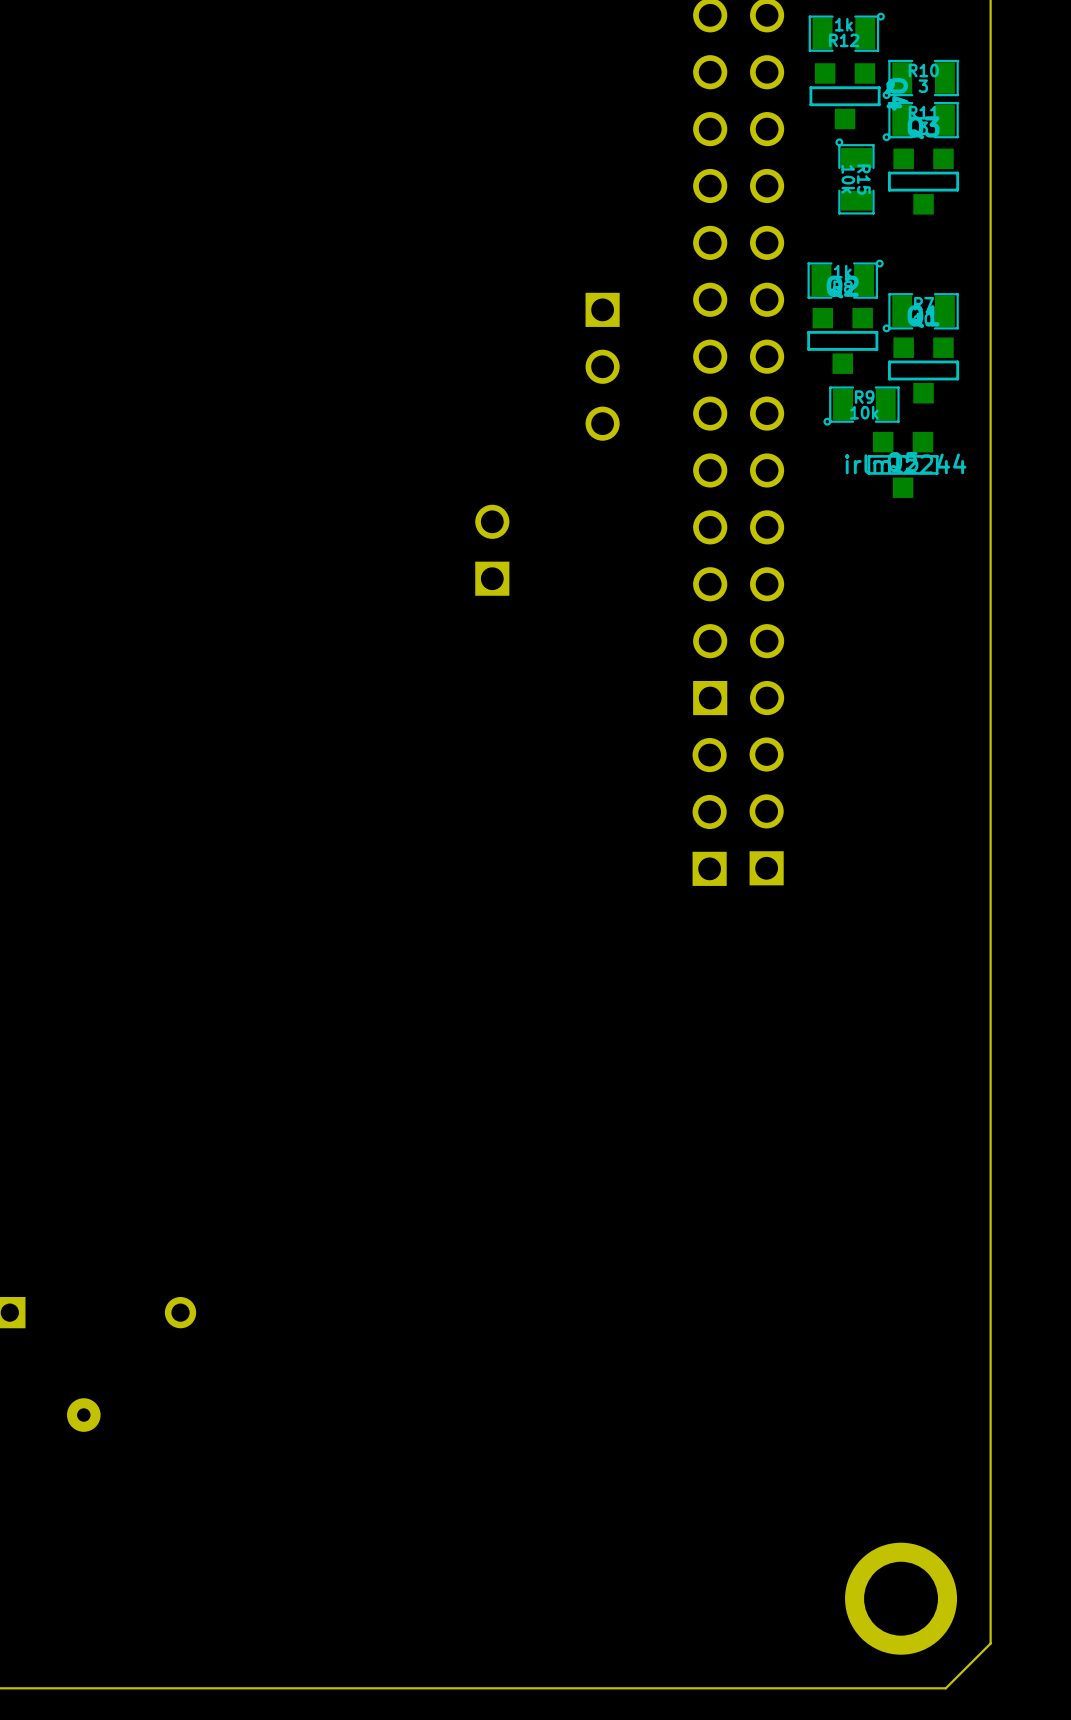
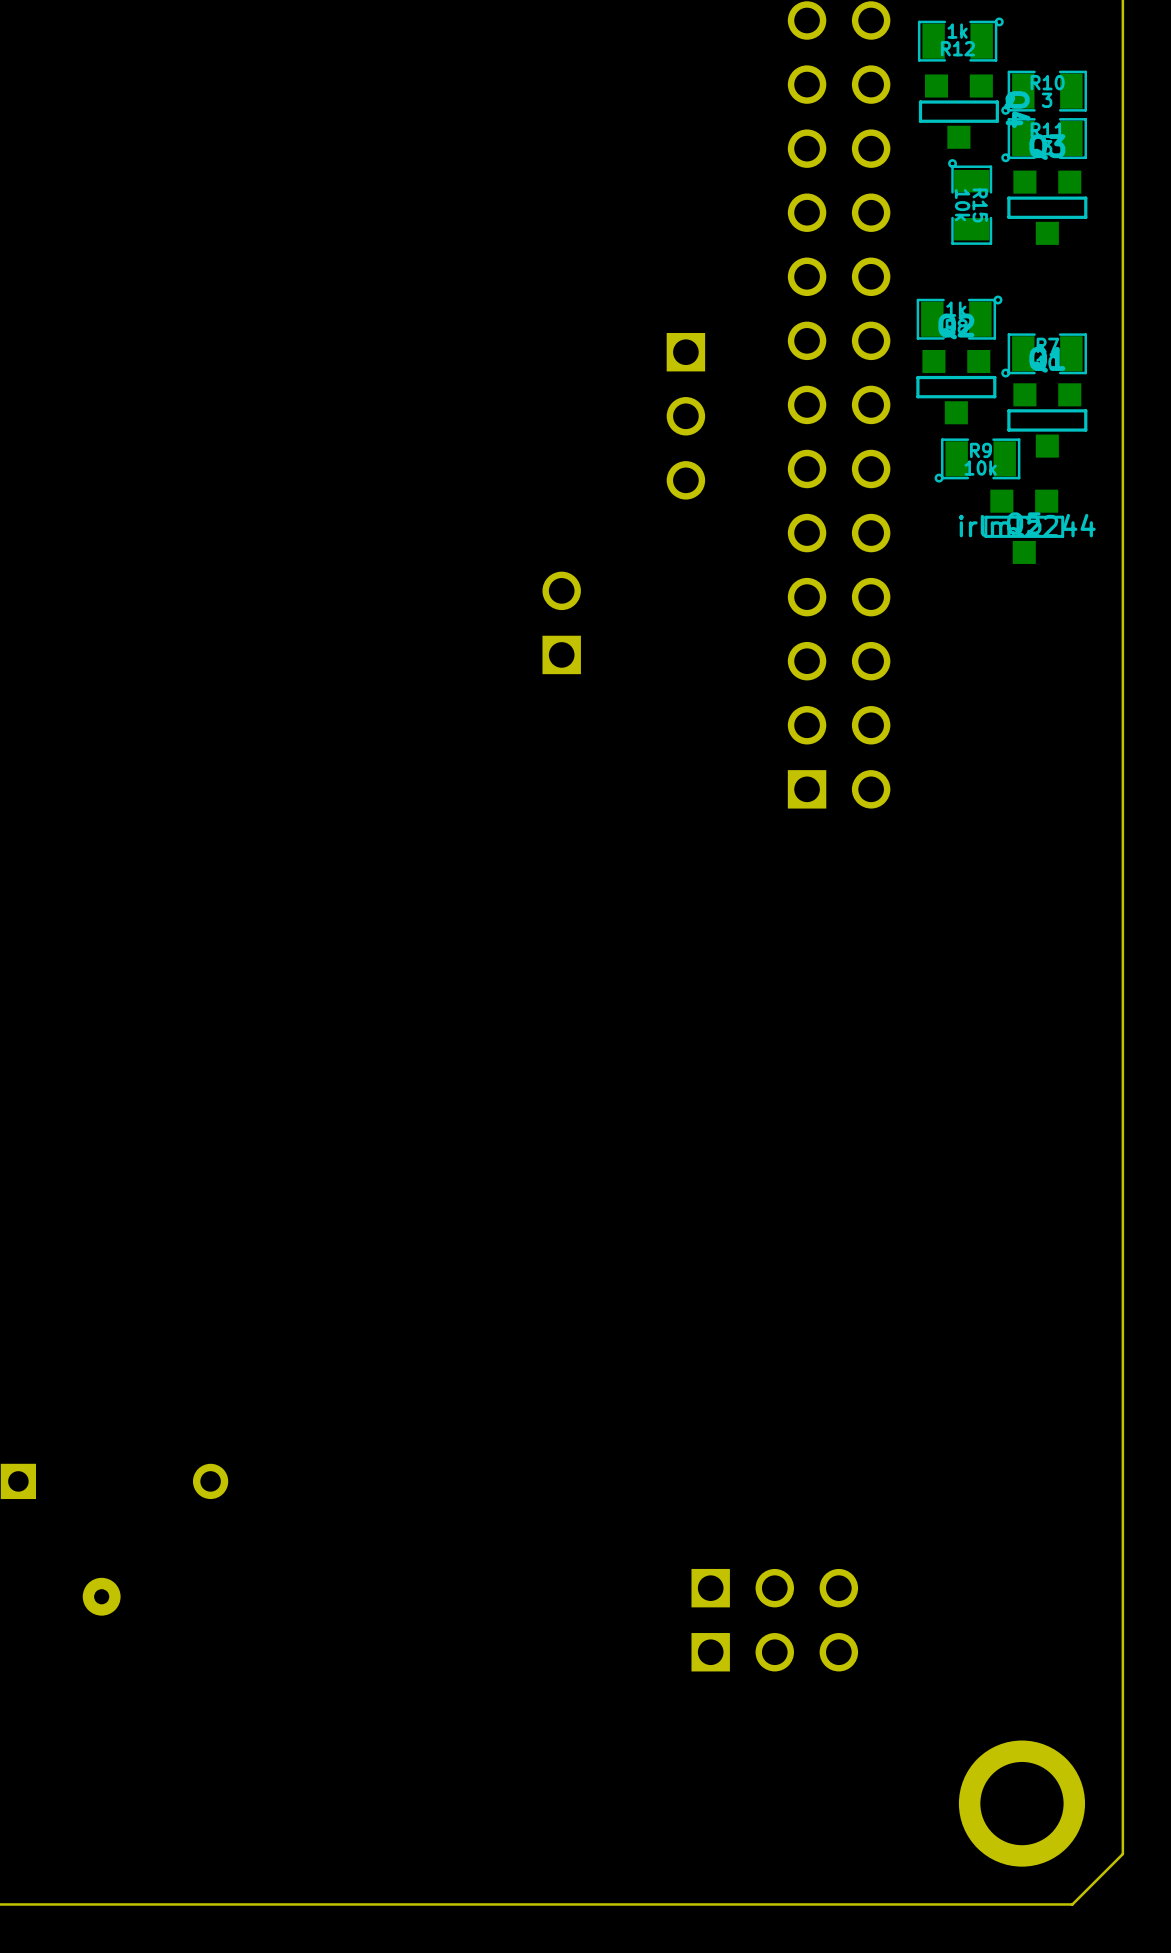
part: (709, 811) -> none
part: (766, 811) -> none
part: none -> (774, 1588)
part: none -> (774, 1652)

